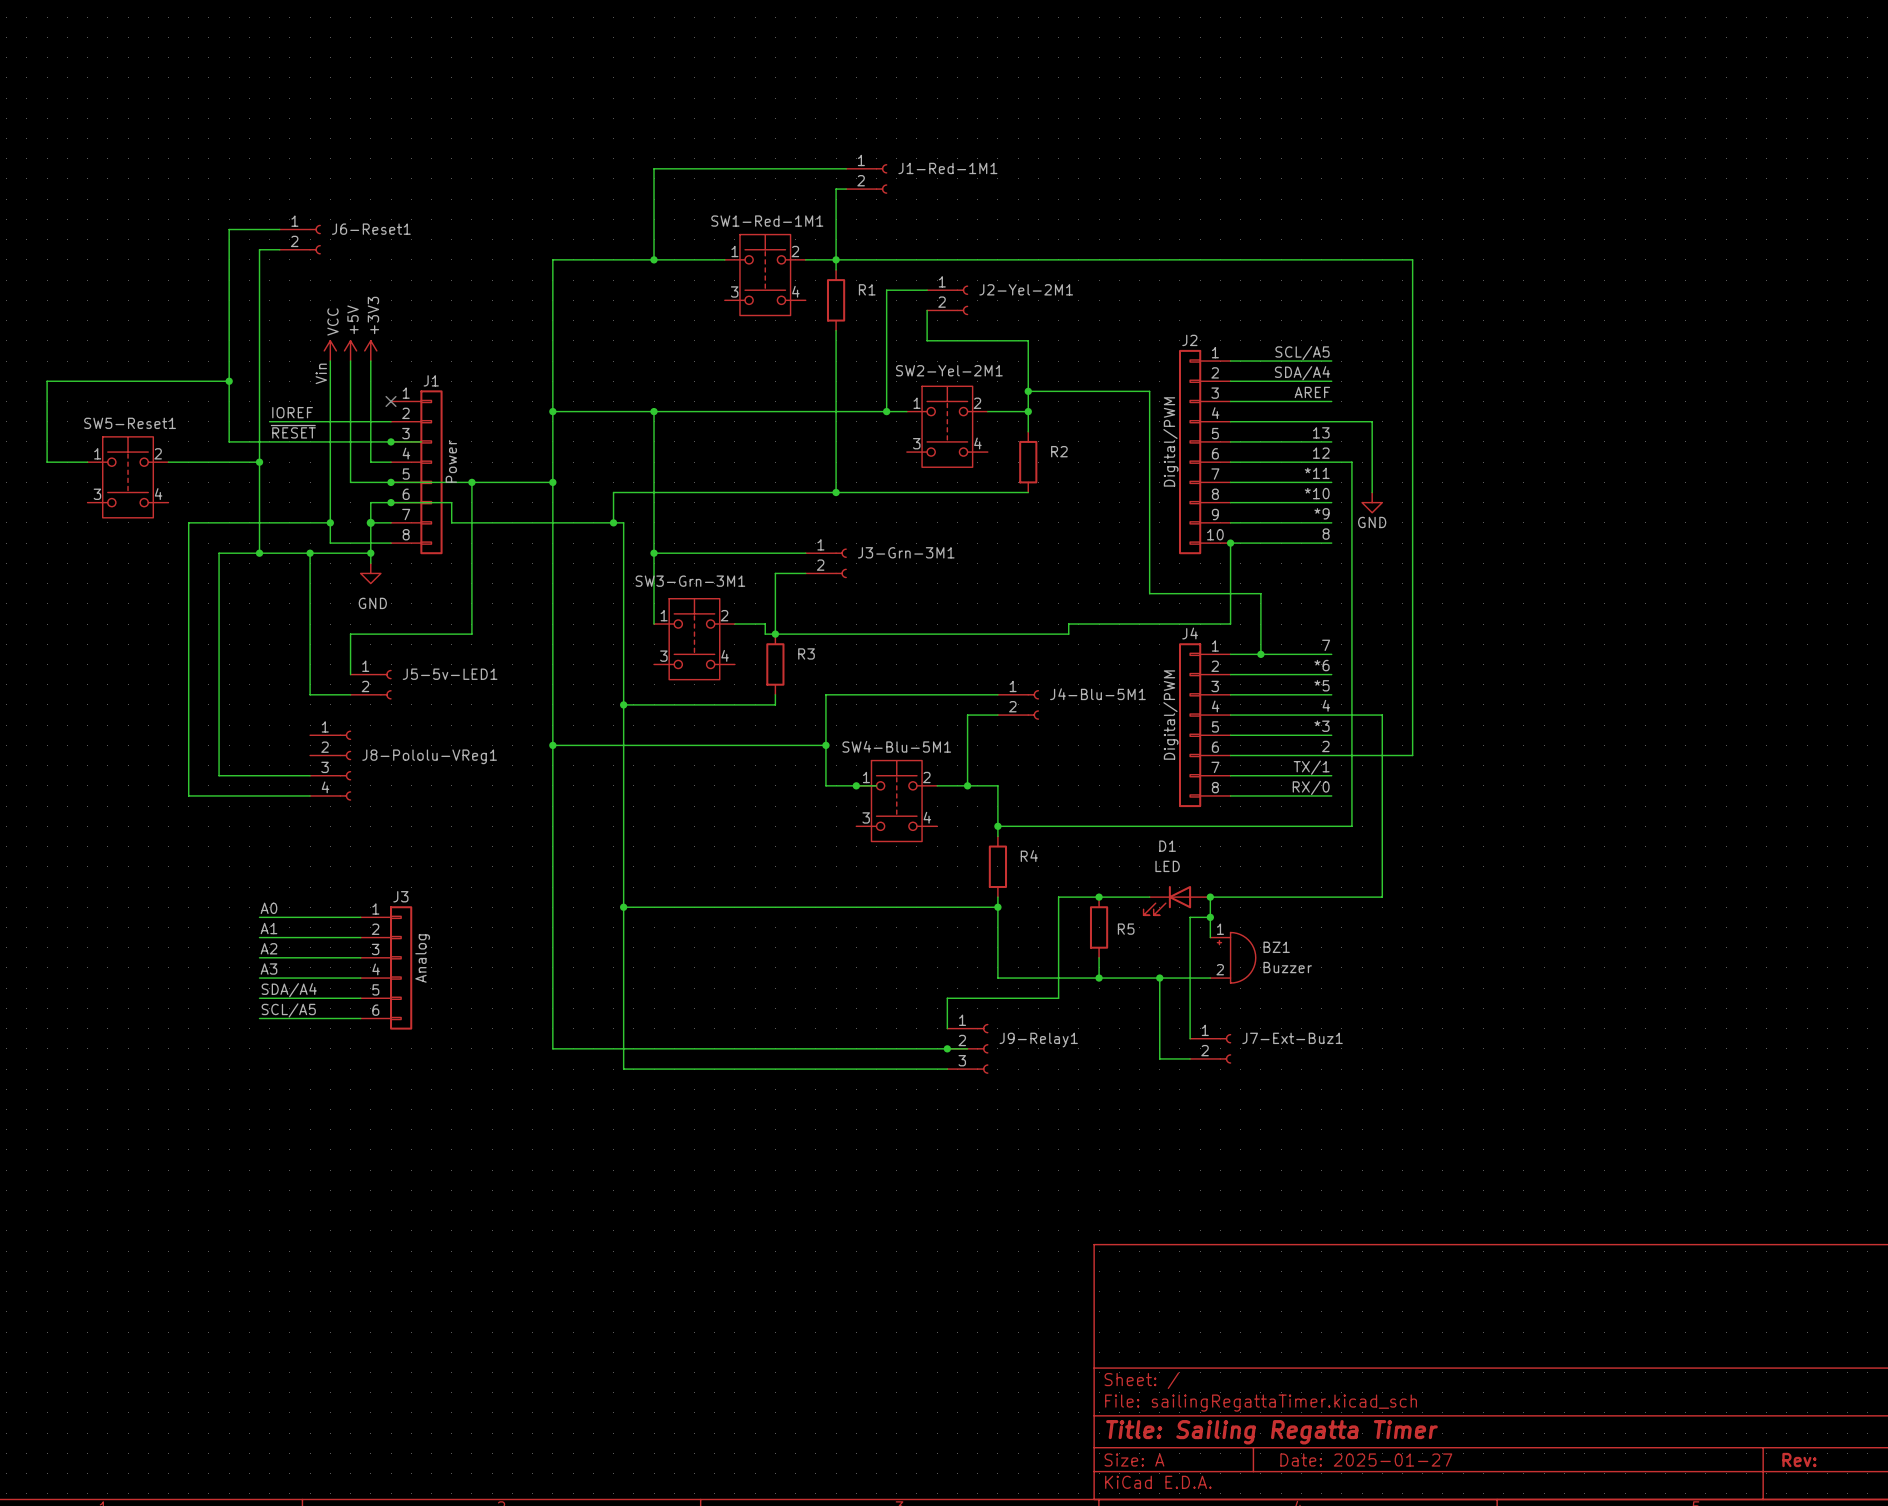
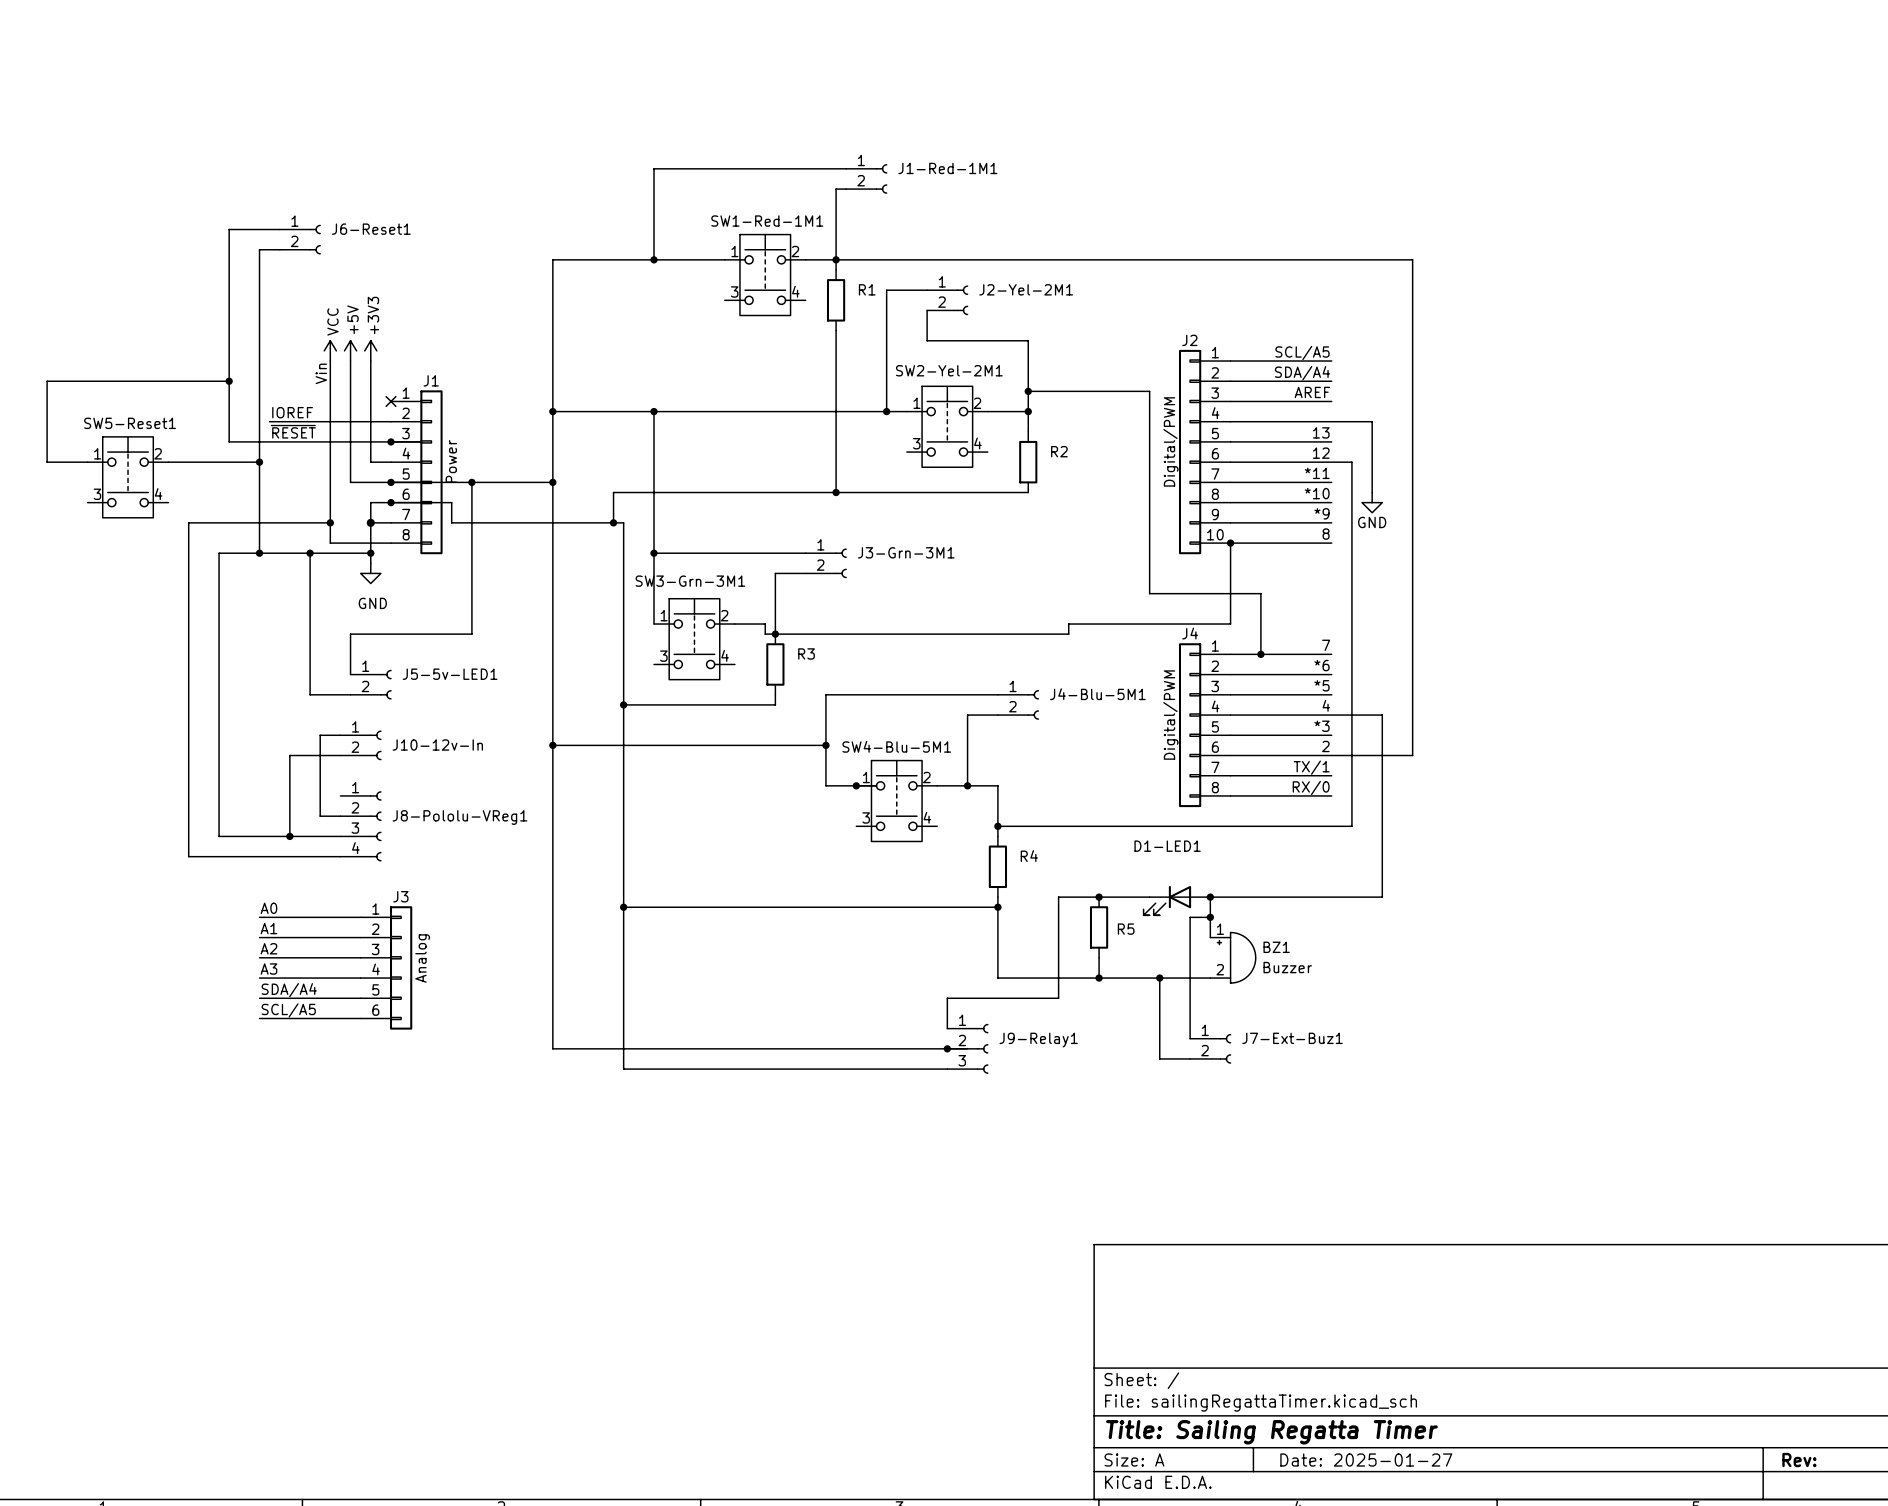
wire: none -> (340, 735) (320, 735) (320, 816) (340, 816)
J10-12v-In: none -> (360, 745)
wire: none -> (340, 755) (289, 755) (289, 836)
J8-Pololu-VReg1 position: (330, 765) -> (360, 826)
wire: (219, 775) (310, 775) -> (219, 775) (219, 836) (340, 836)
wire: (188, 795) (310, 795) -> (188, 795) (188, 856) (340, 856)
junction: none -> (289, 836)
D1 name: D1 (1167, 846) -> D1-LED1 (1167, 846)
D1 value: LED (1167, 866) -> none

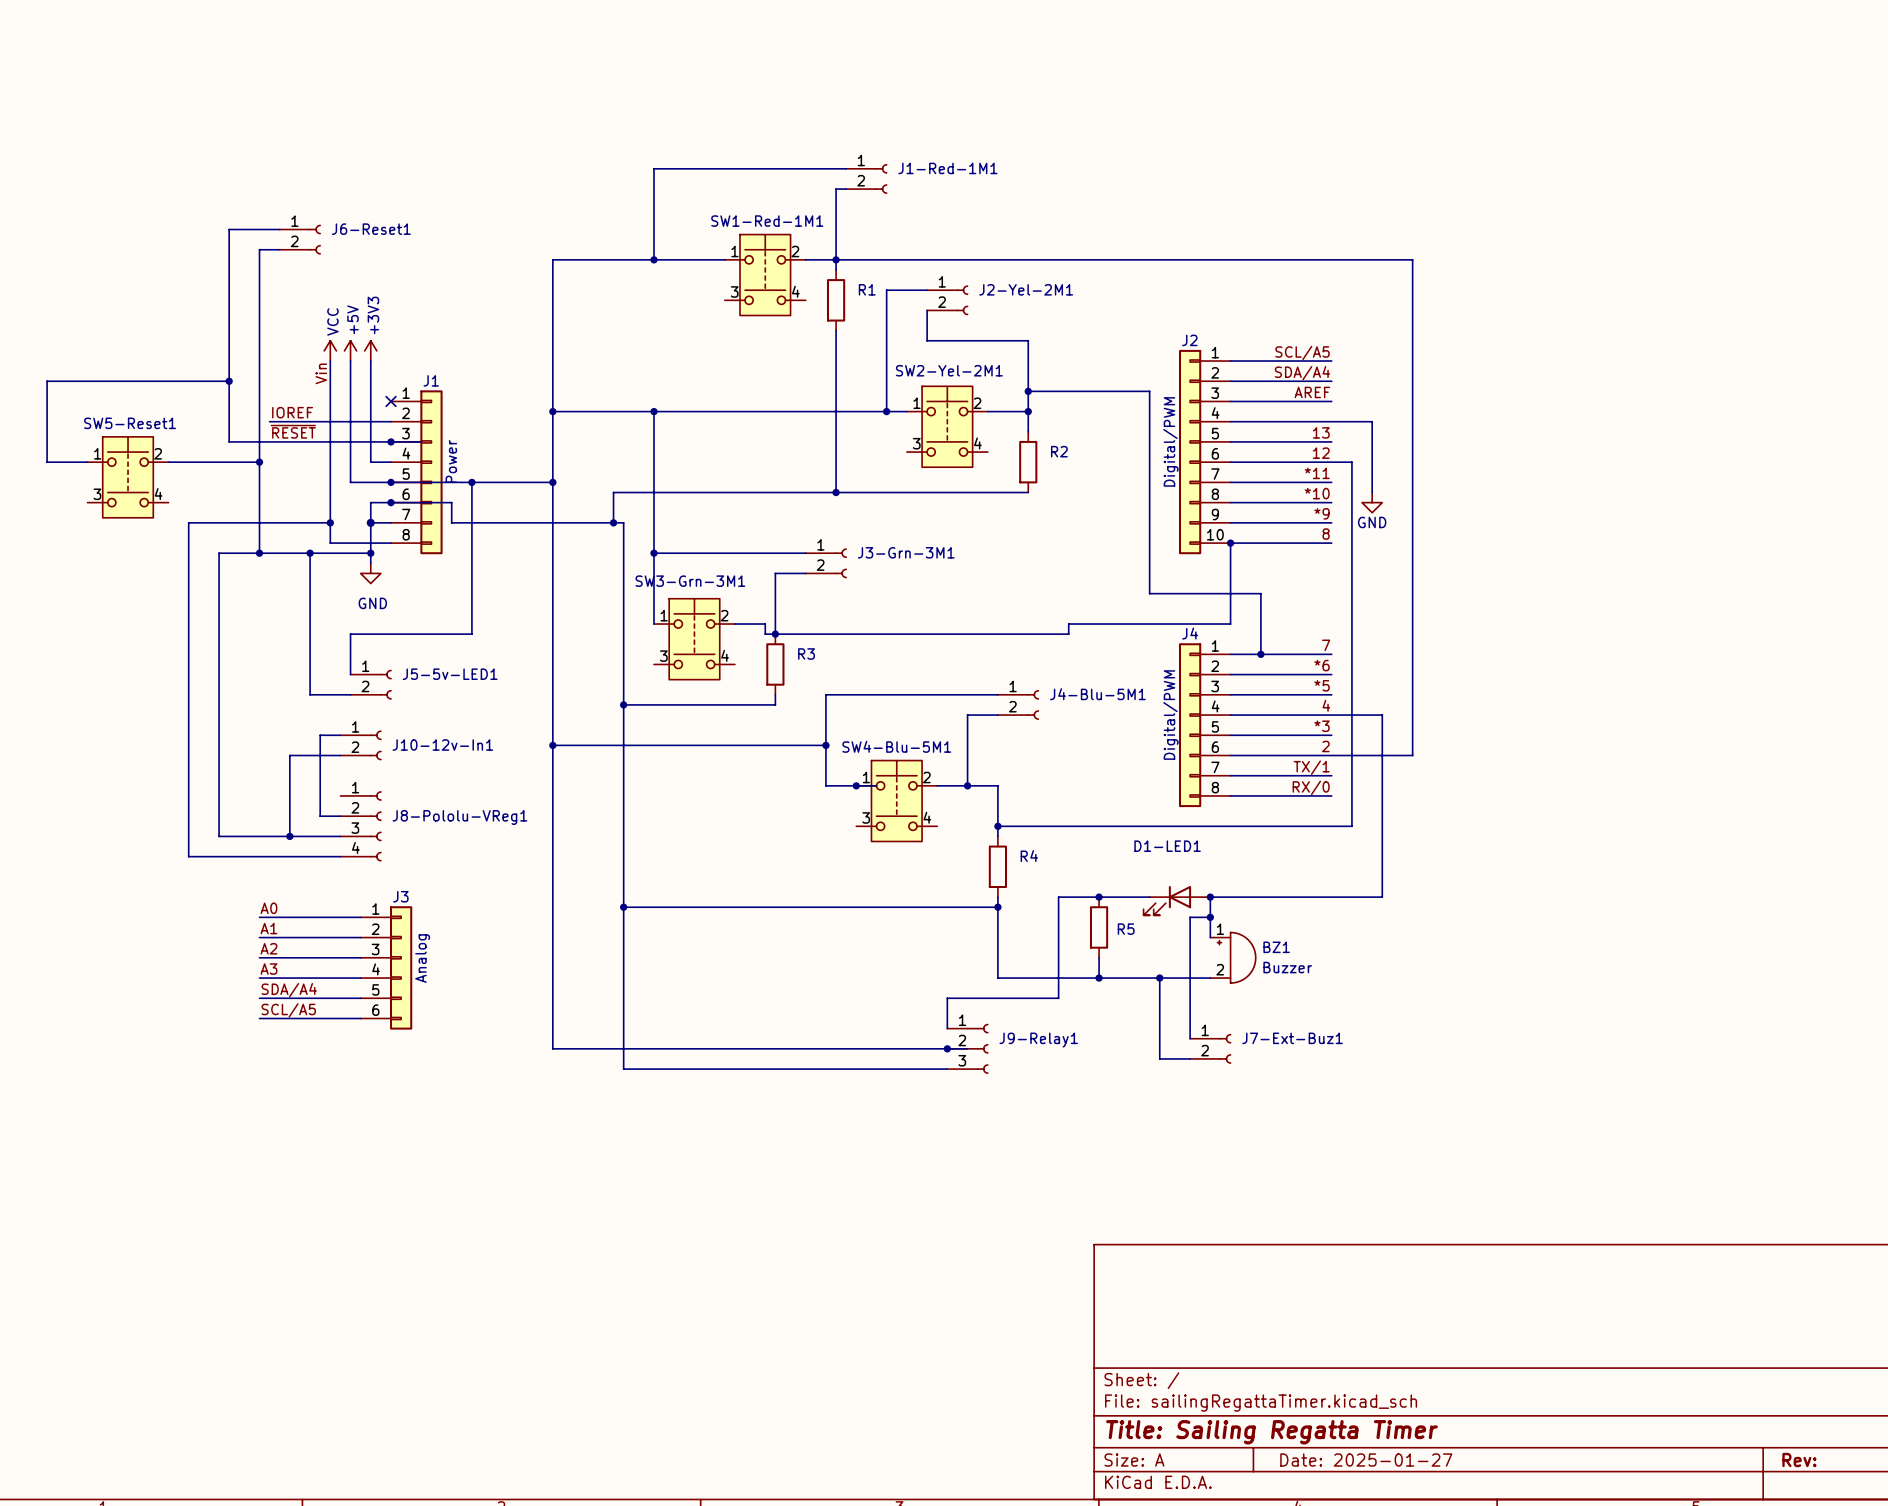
J10-12v-In name: J10-12v-In (437, 745) -> J10-12v-In1 (442, 745)

